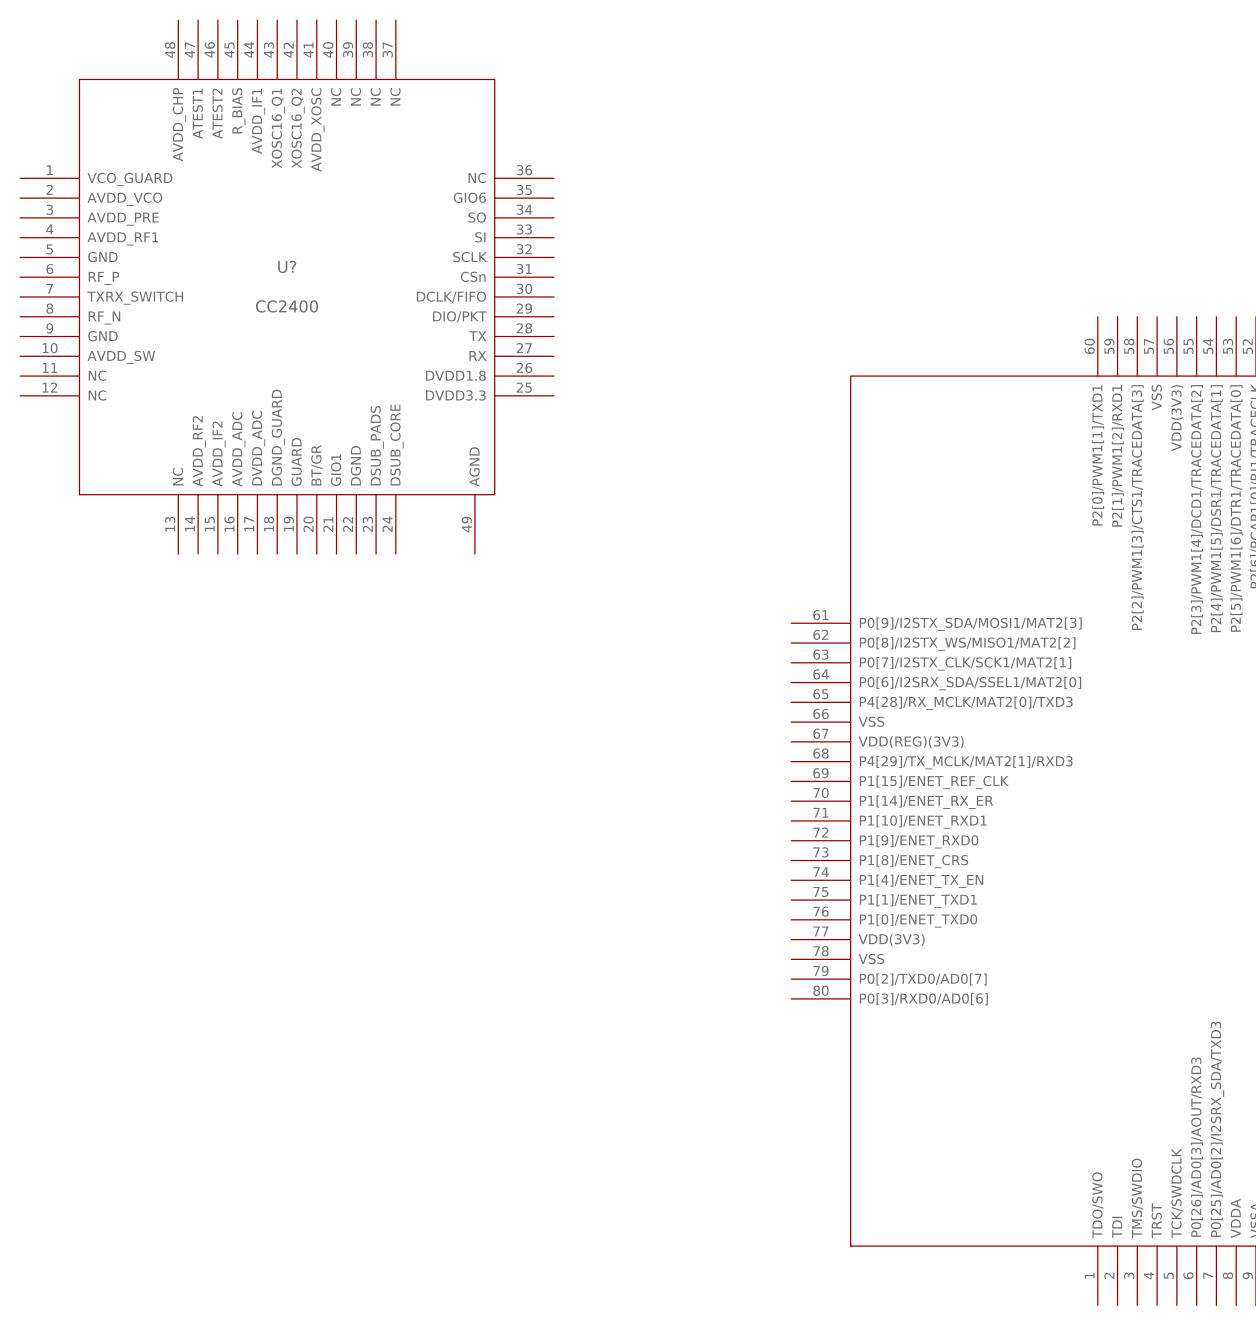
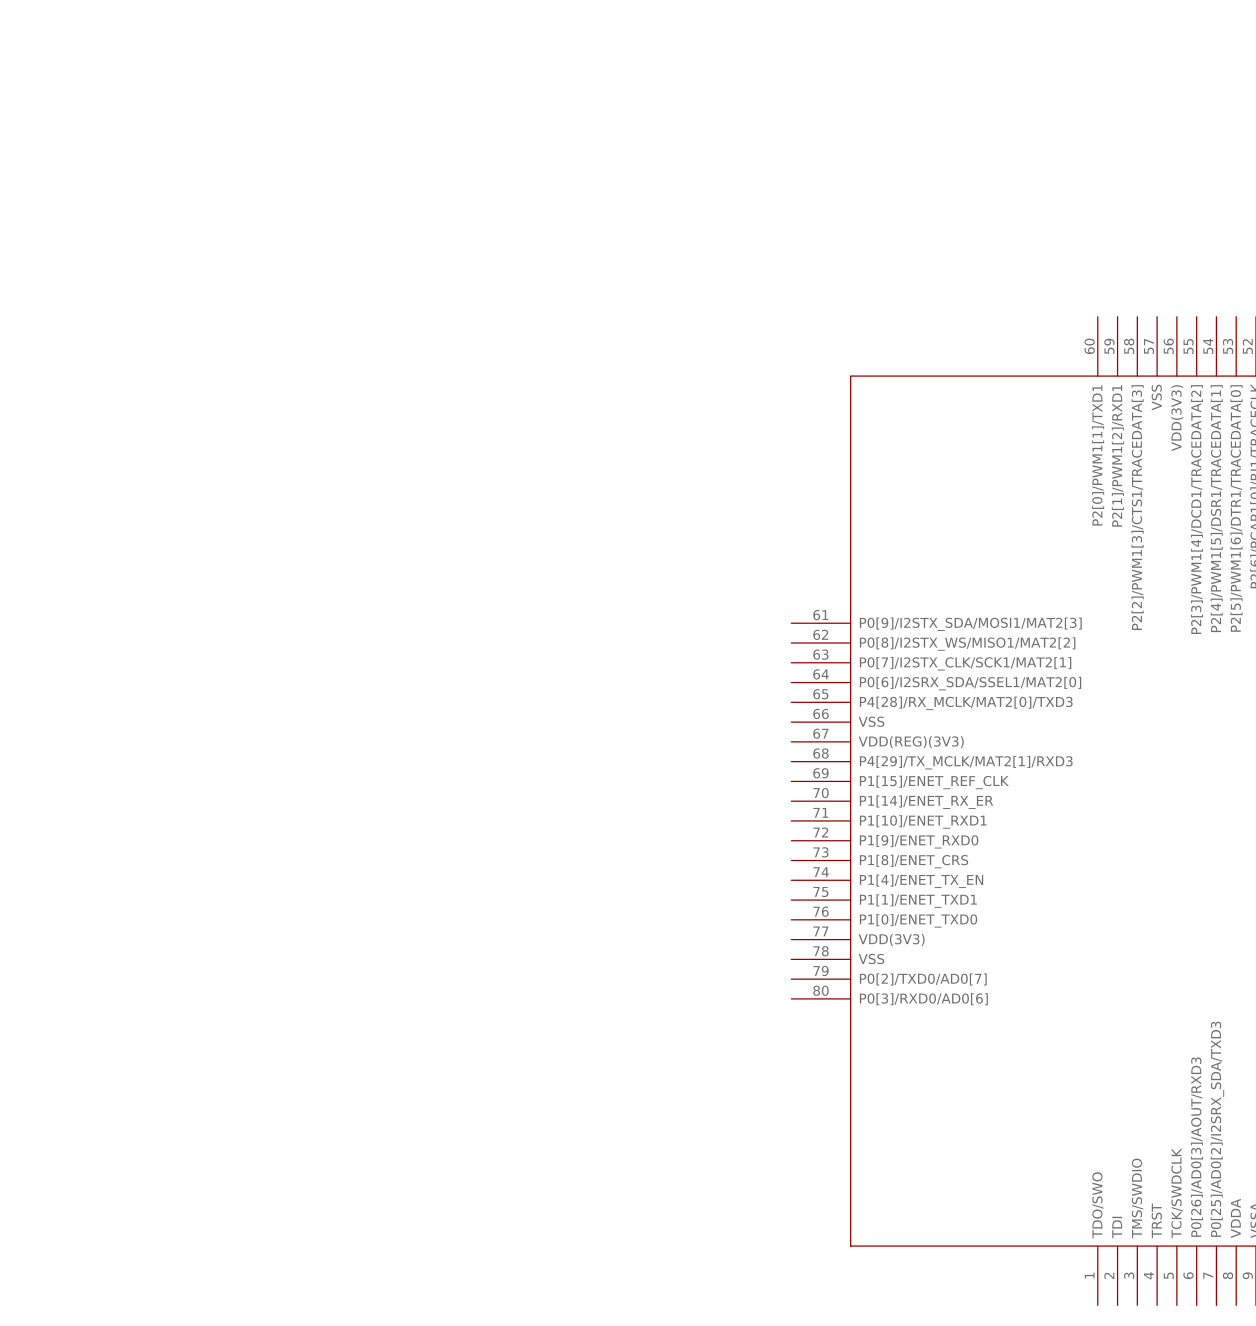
U?: CC2400 (287, 287) -> none

